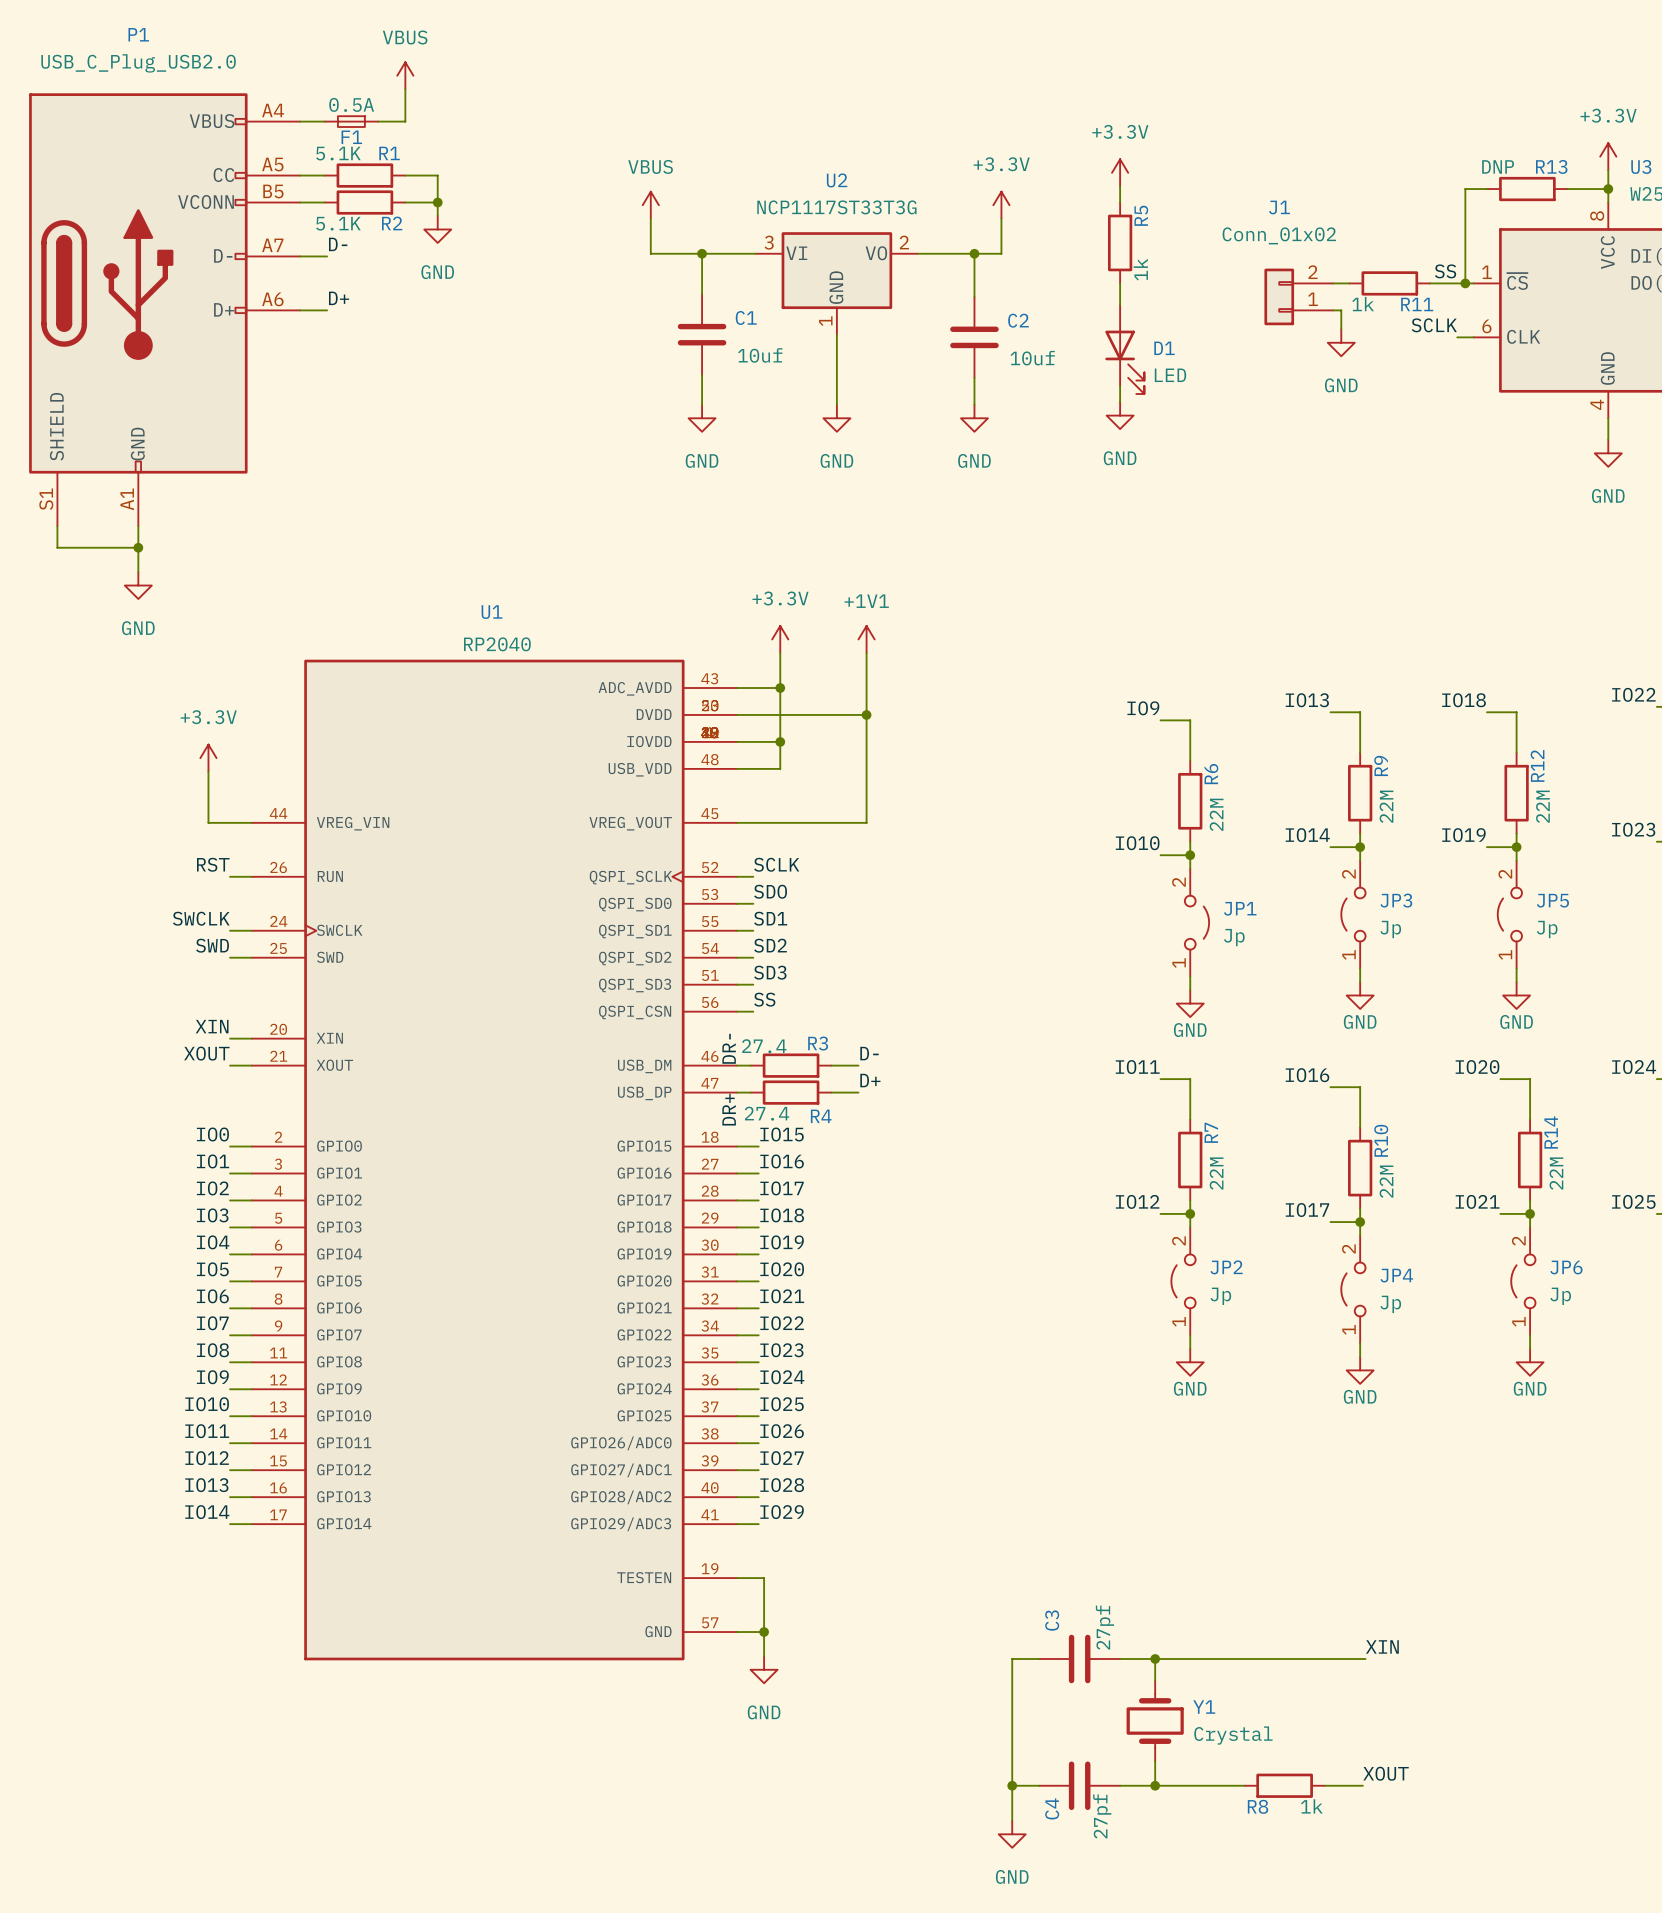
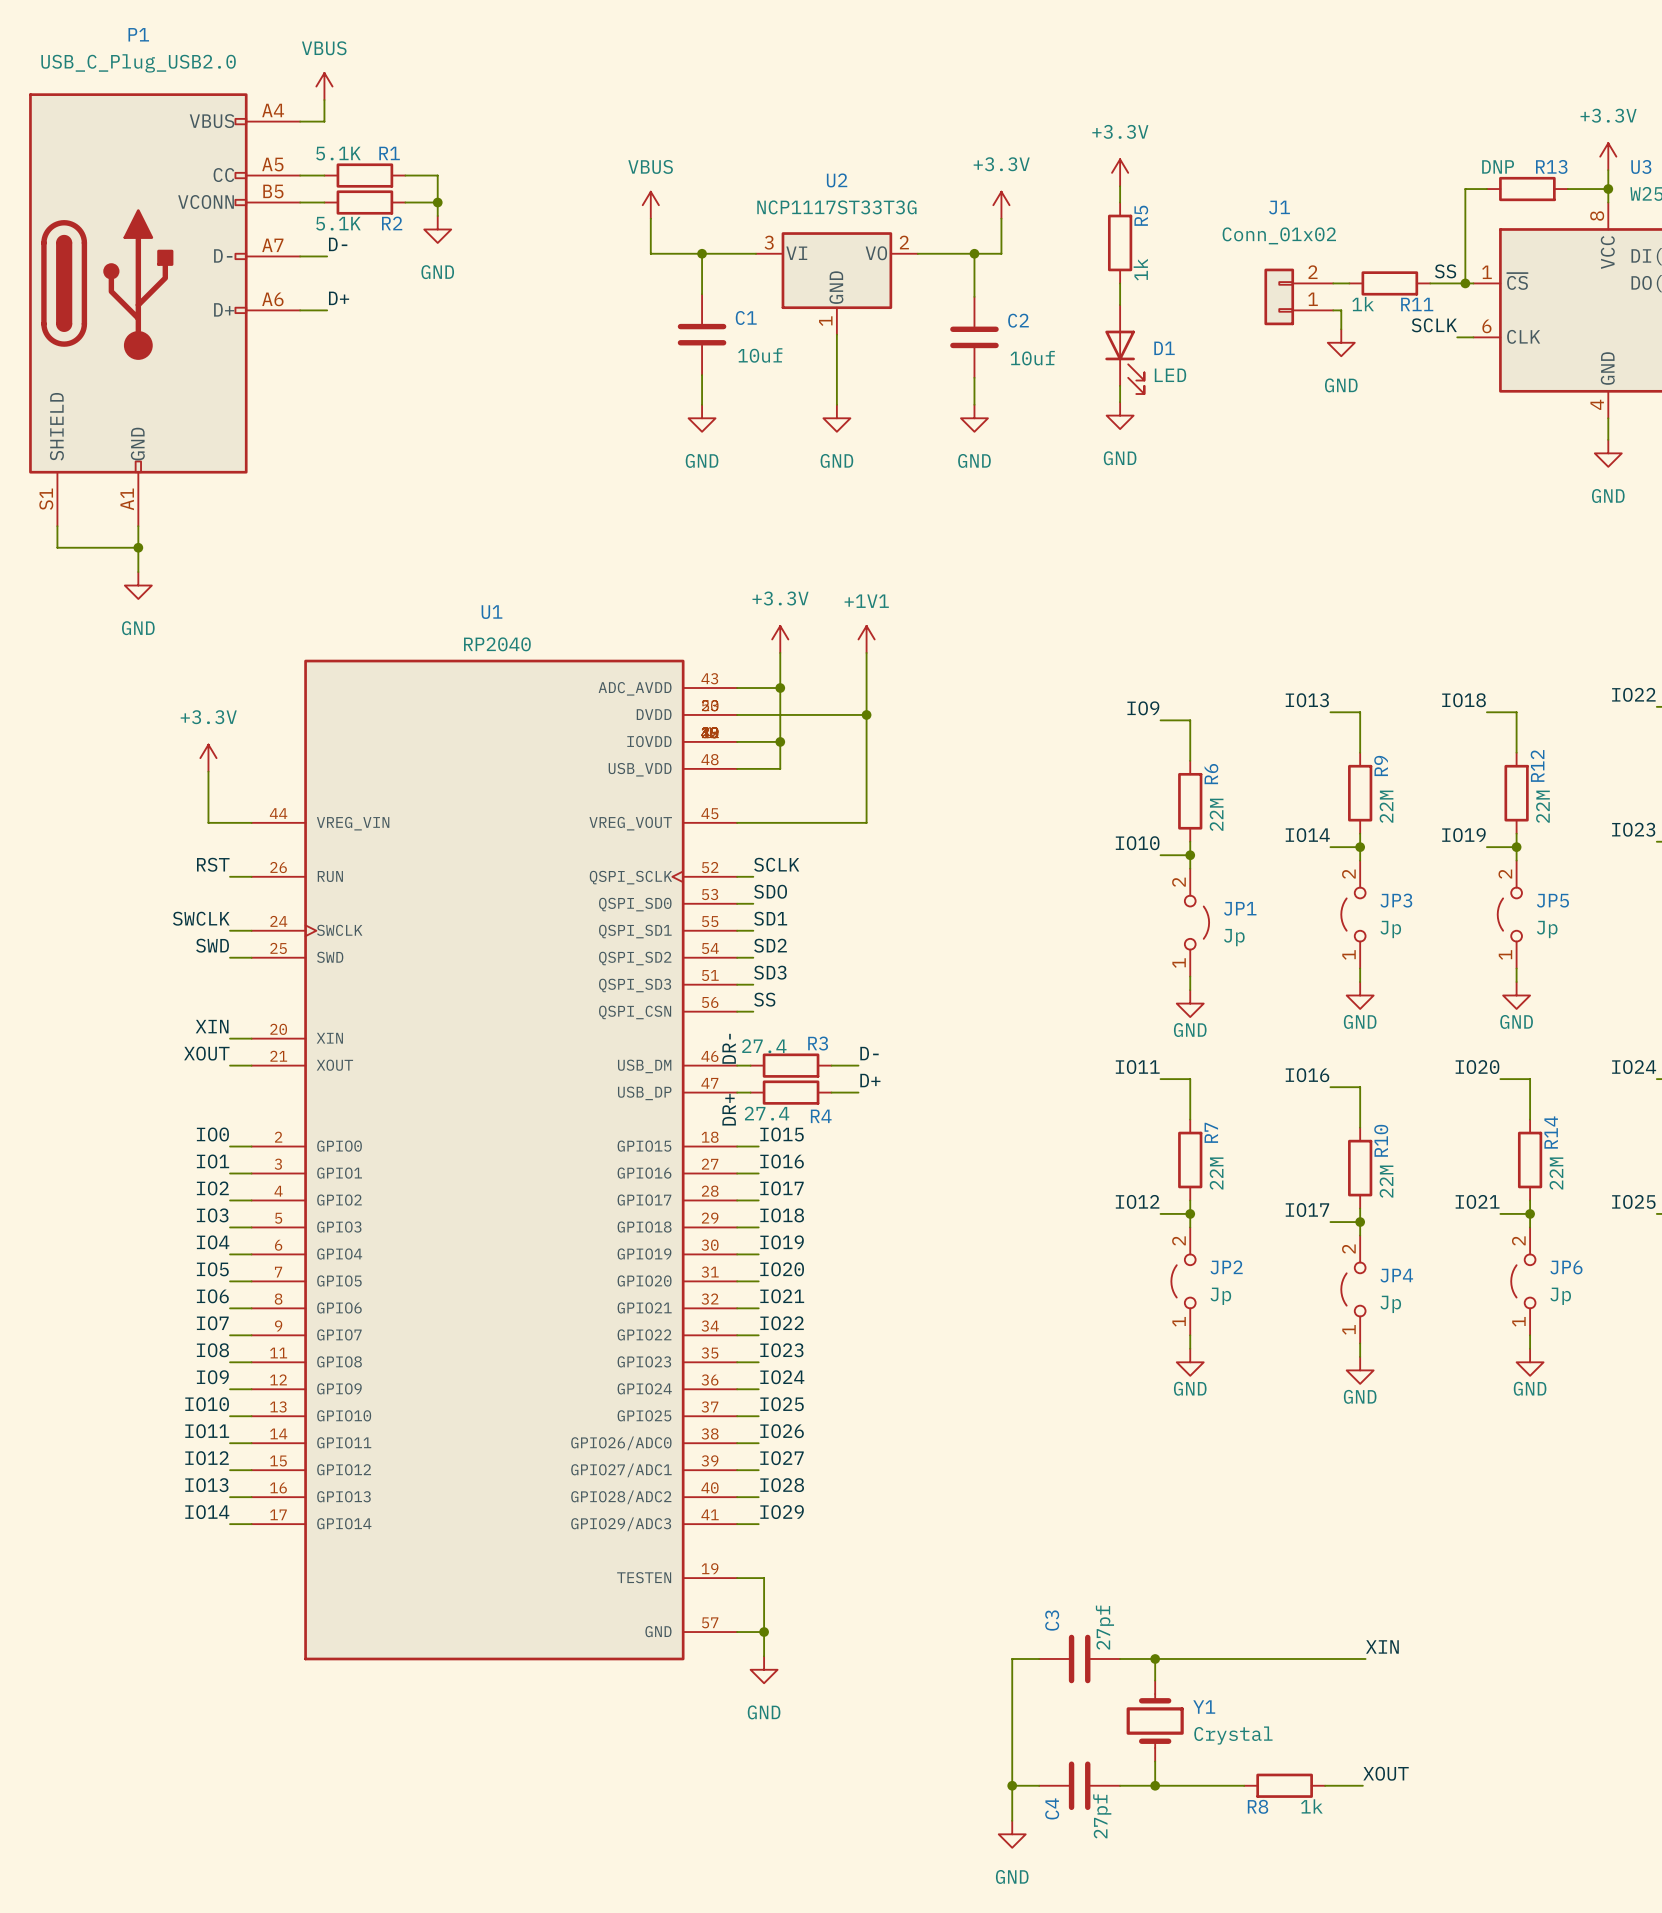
power symbol position: VBUS (405, 75) -> VBUS (324, 86)
wire: (405, 89) (405, 121) (378, 121) -> none
wire: none -> (324, 100) (324, 121)
F1: 0.5A (351, 121) -> none

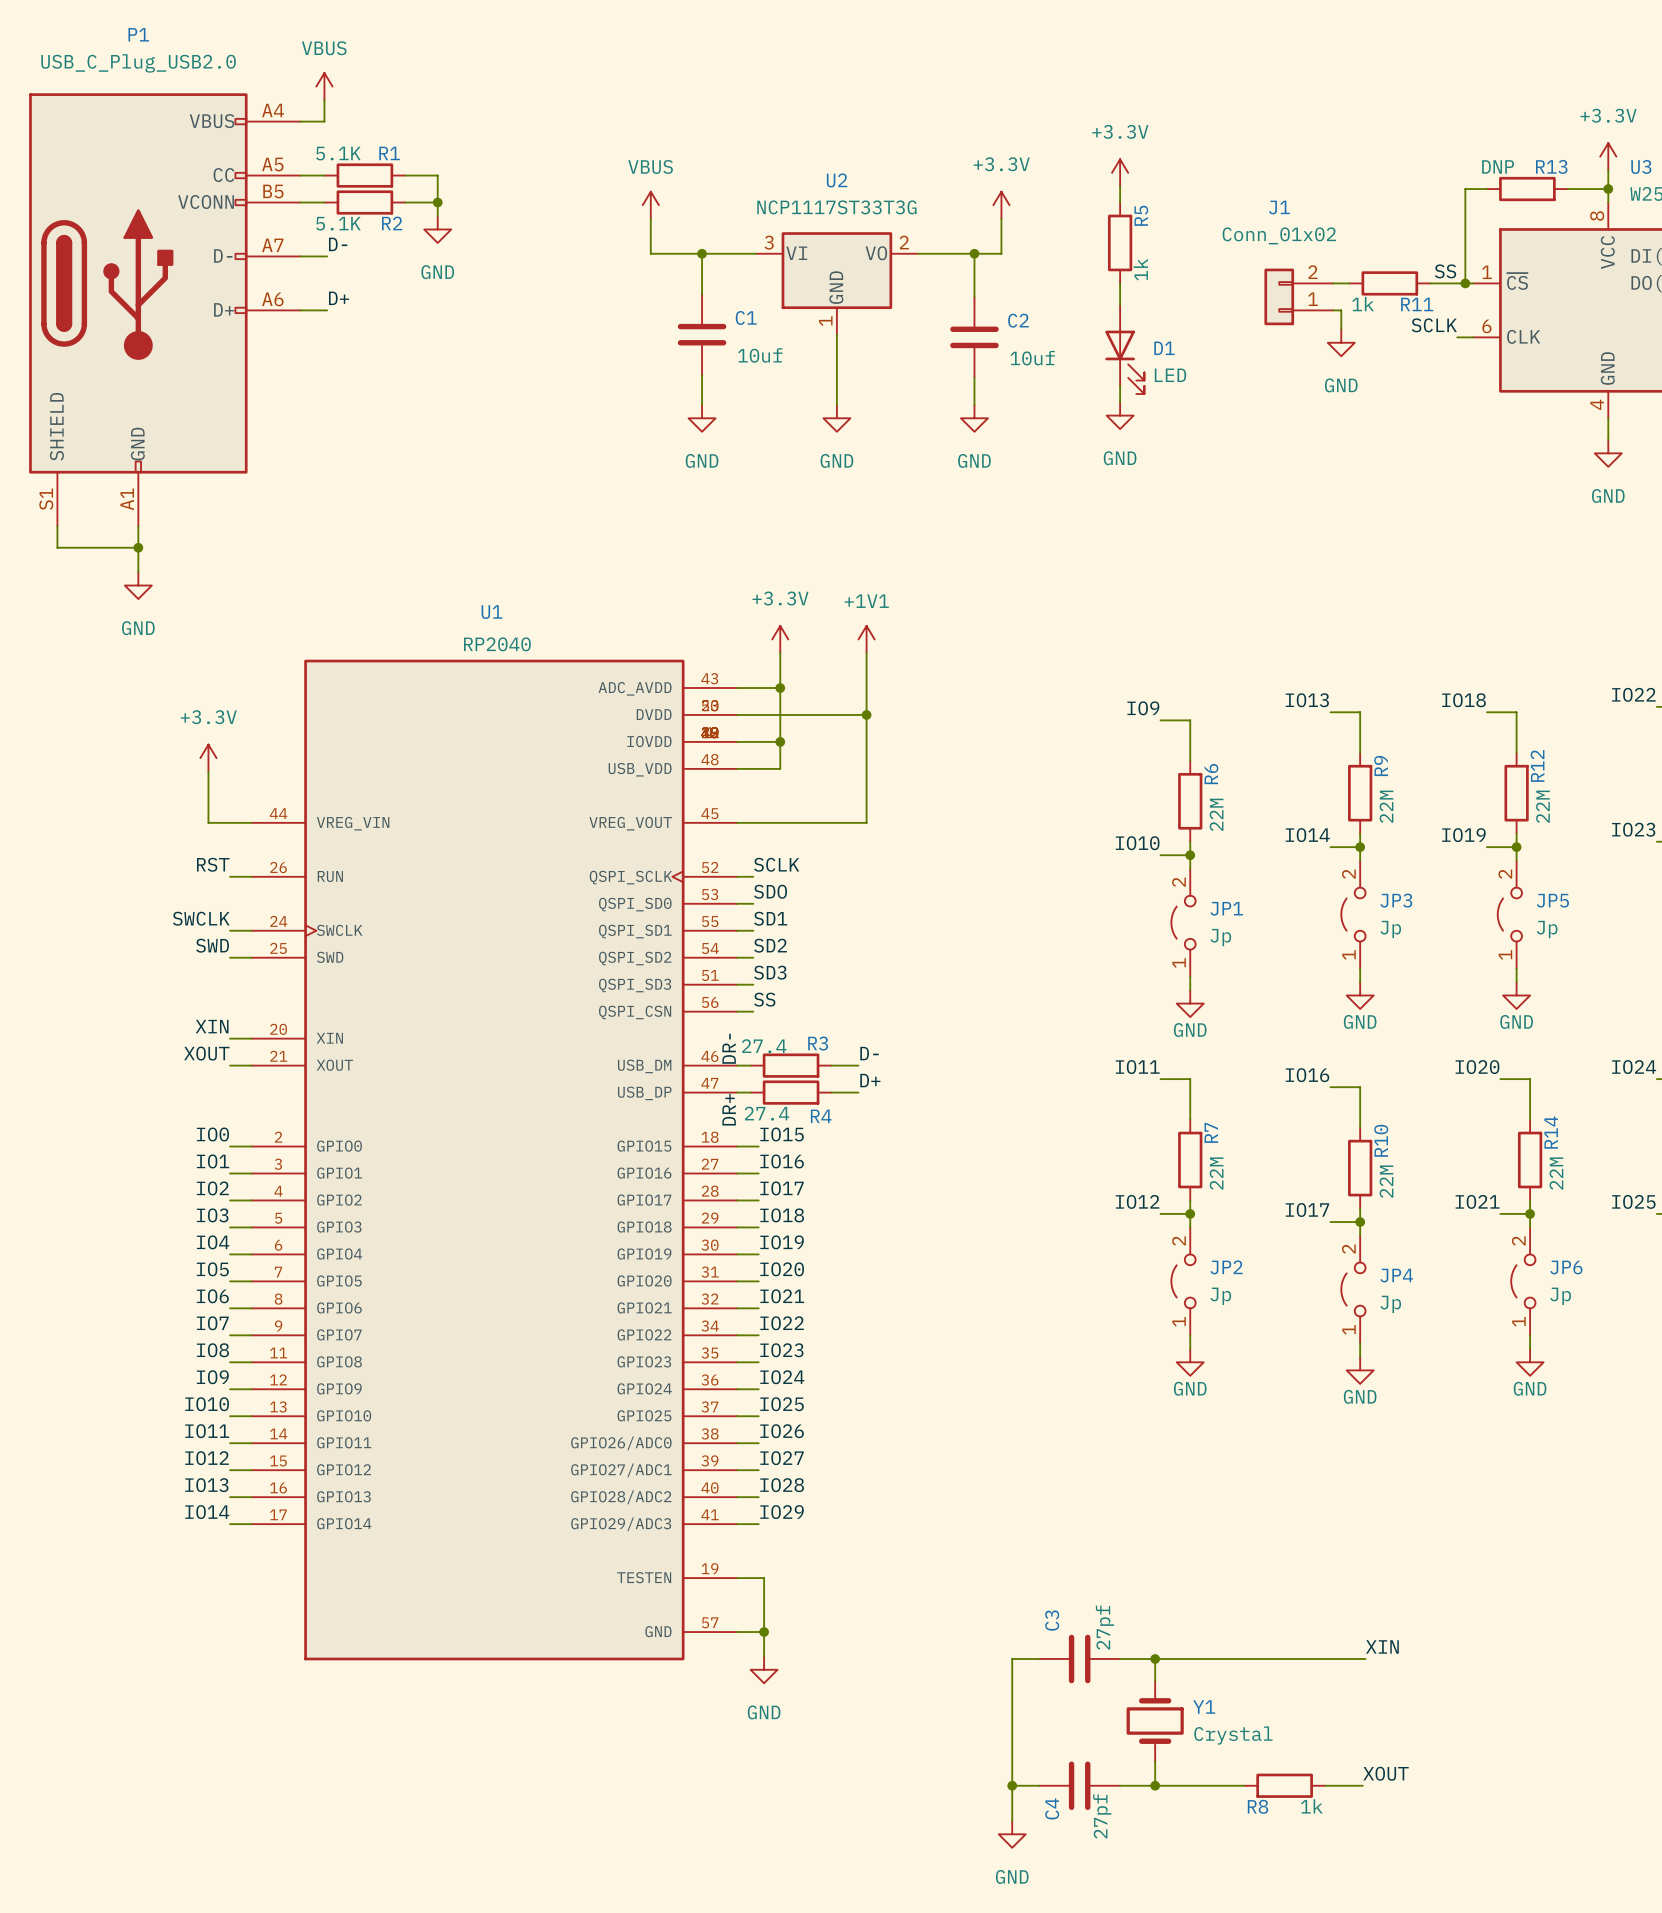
JP1 flip: as is (1196, 922) -> left-right (1183, 922)

